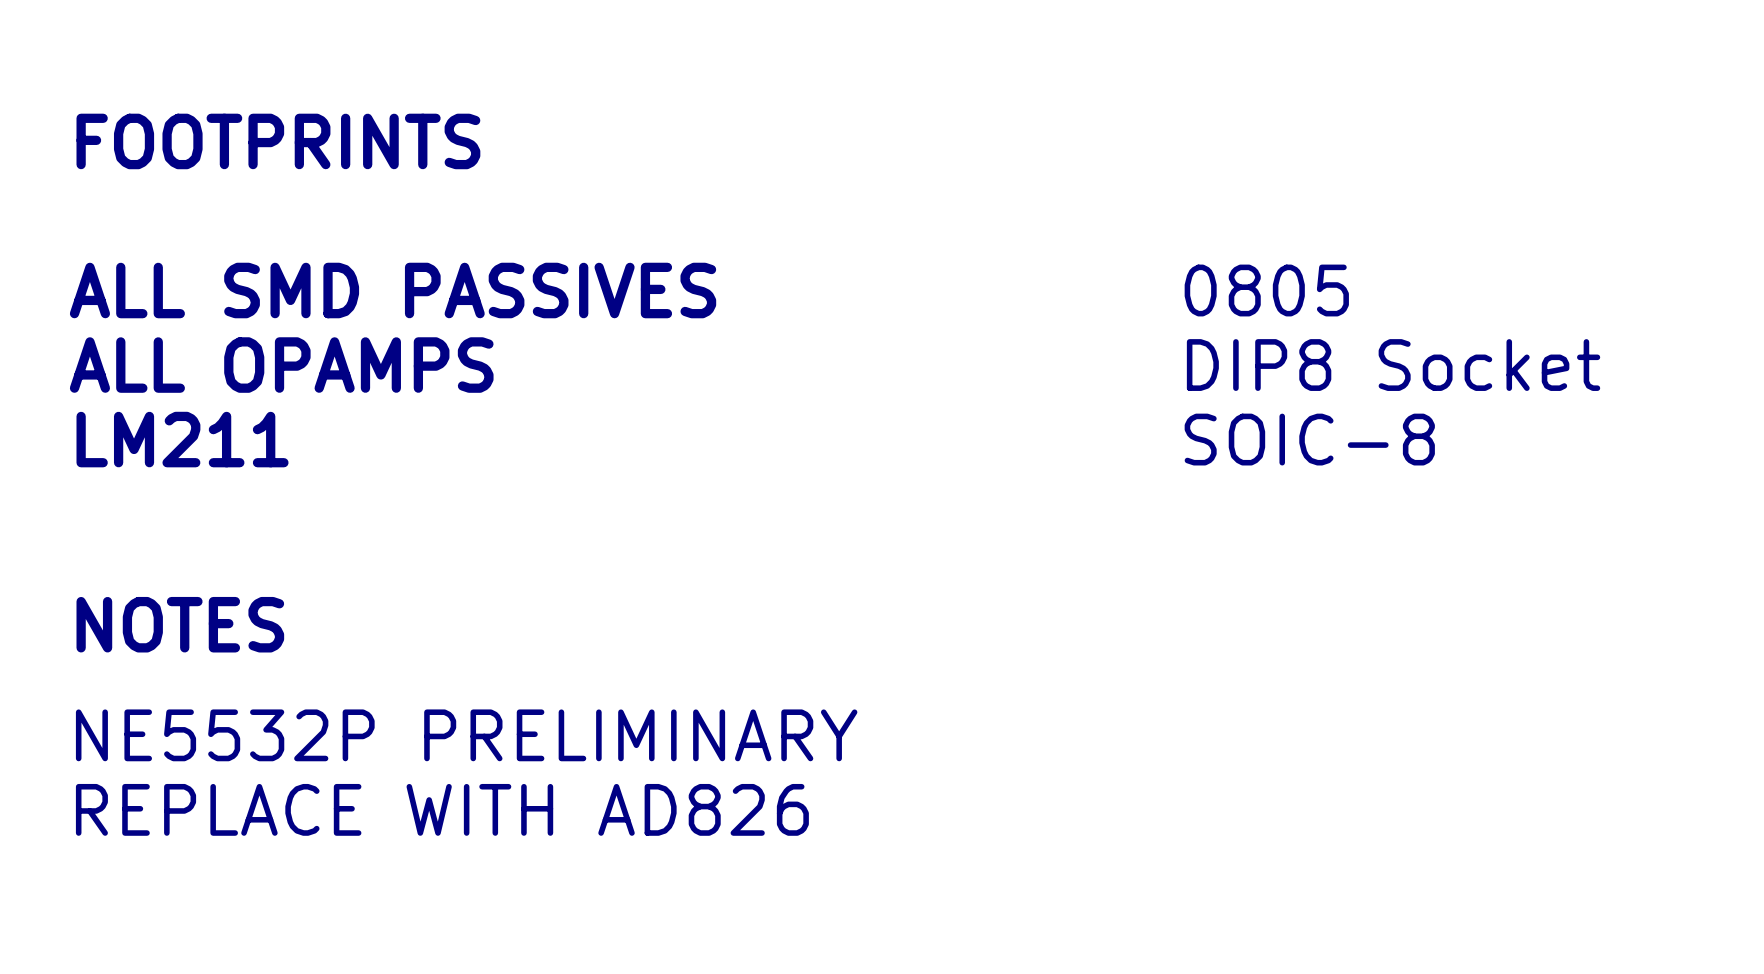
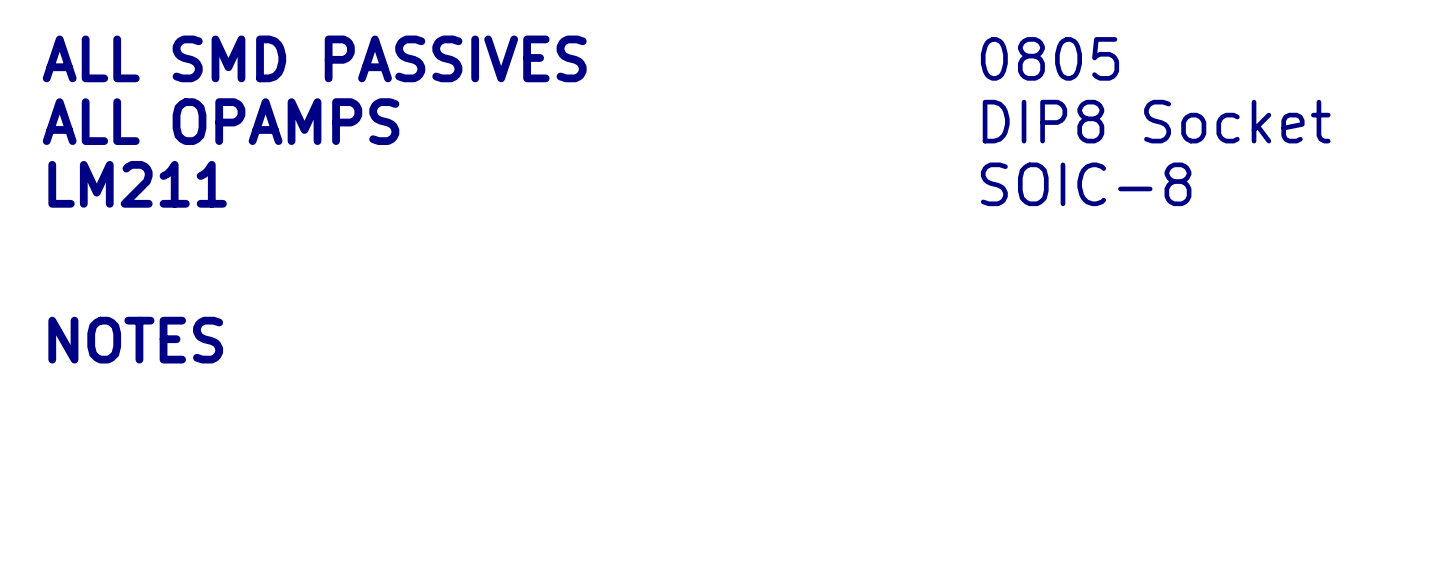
text: NE5532P PRELIMINARY (466, 735) -> none
text: REPLACE WITH AD826 (442, 809) -> none

